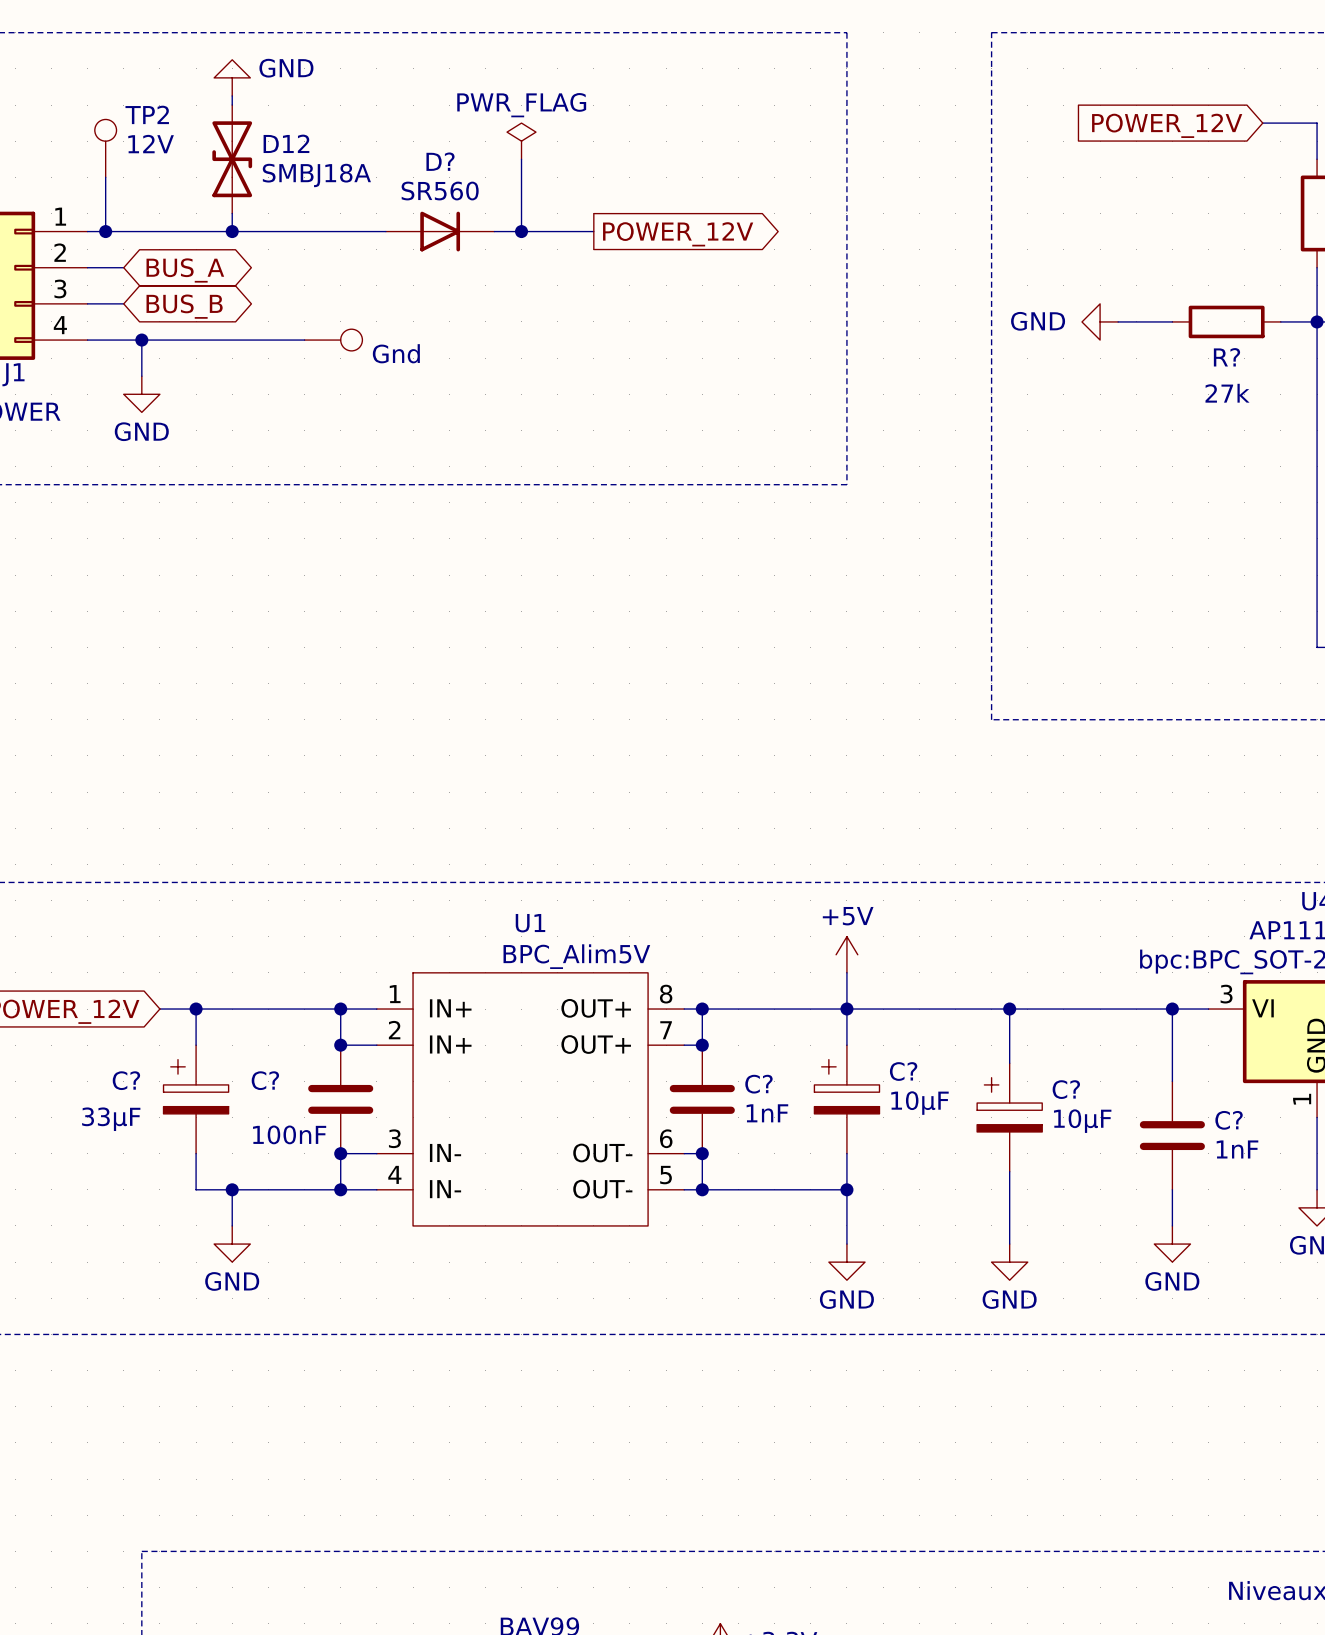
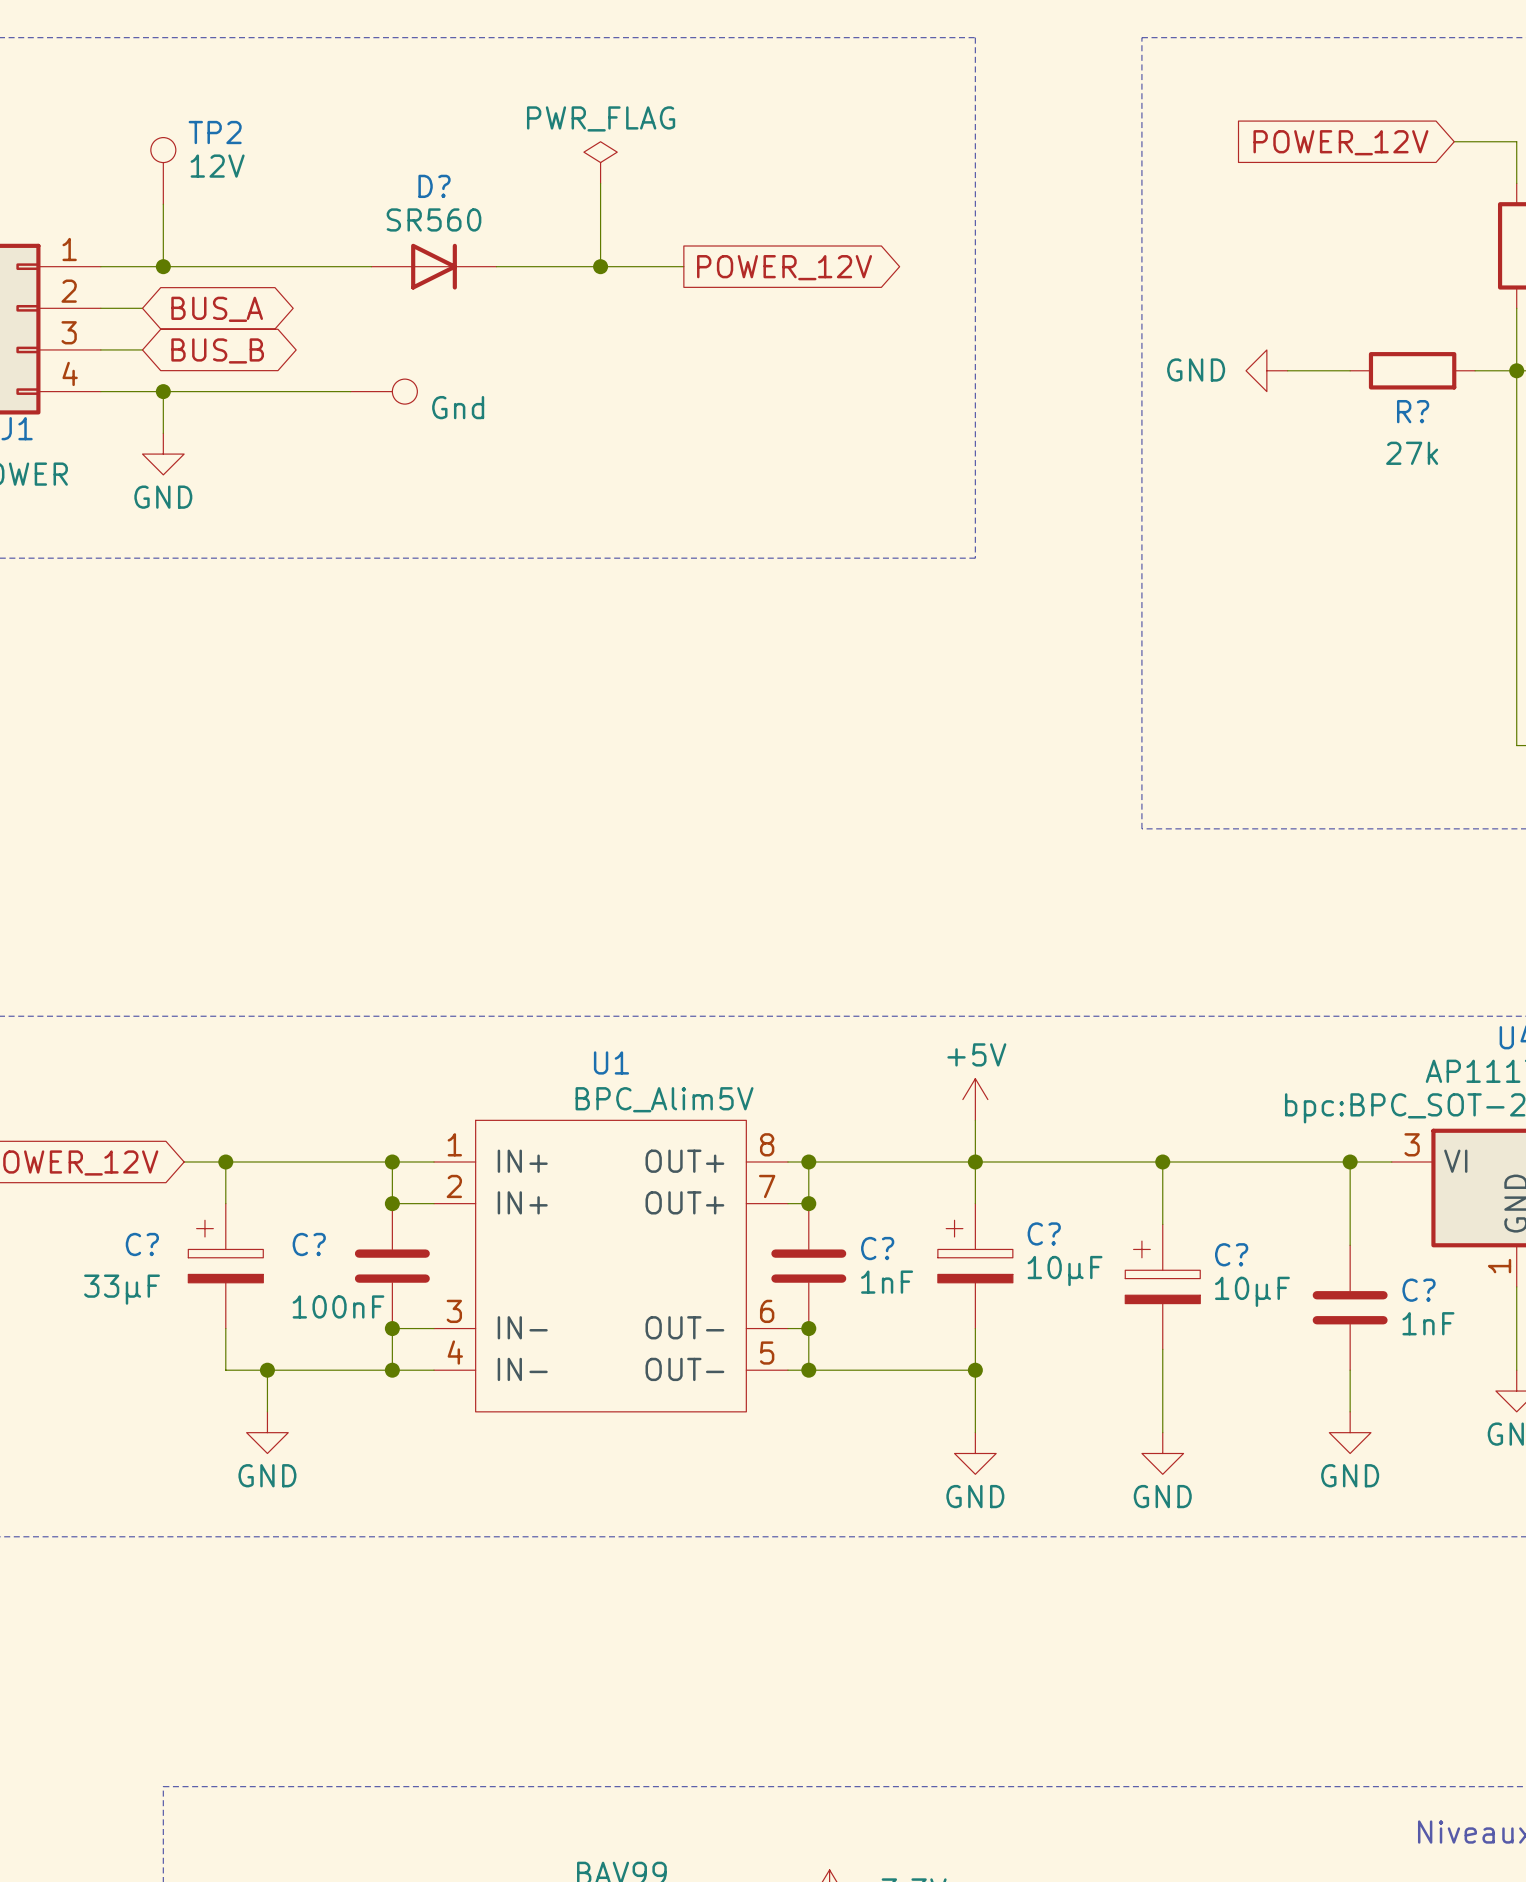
power symbol: GND (232, 77) -> none
wire: (232, 95) (232, 105) -> none
TP2 position: (105, 148) -> (163, 170)
D12: SMBJ18A (232, 159) -> none
wire: (105, 177) (105, 231) -> (163, 204) (163, 266)
wire: (232, 213) (232, 231) -> none
junction position: (105, 231) -> (163, 266)
junction: (232, 231) -> none
D? position: (440, 231) -> (434, 266)

